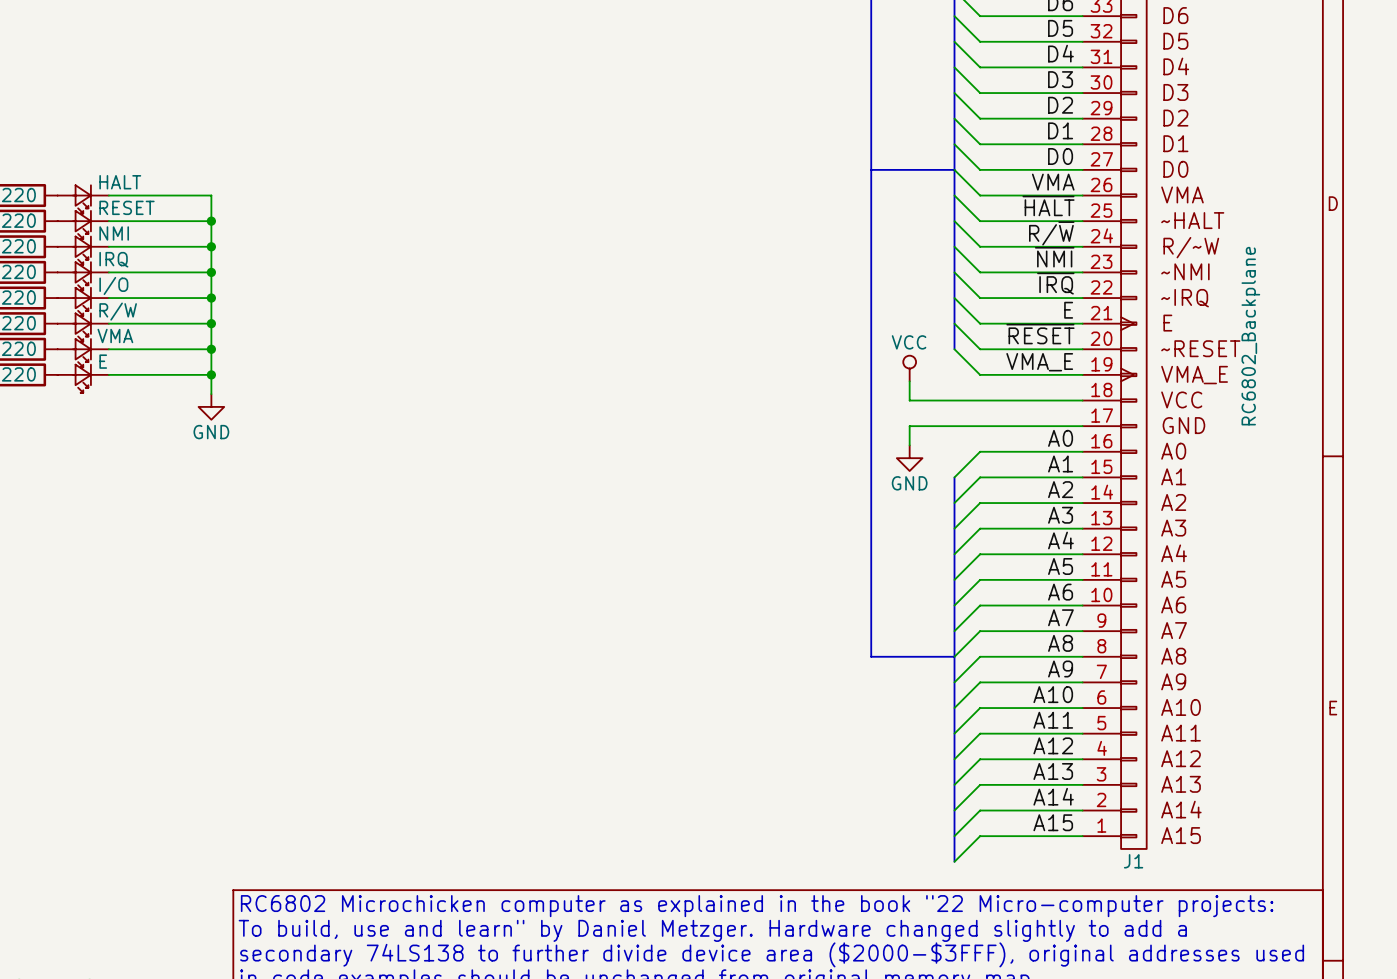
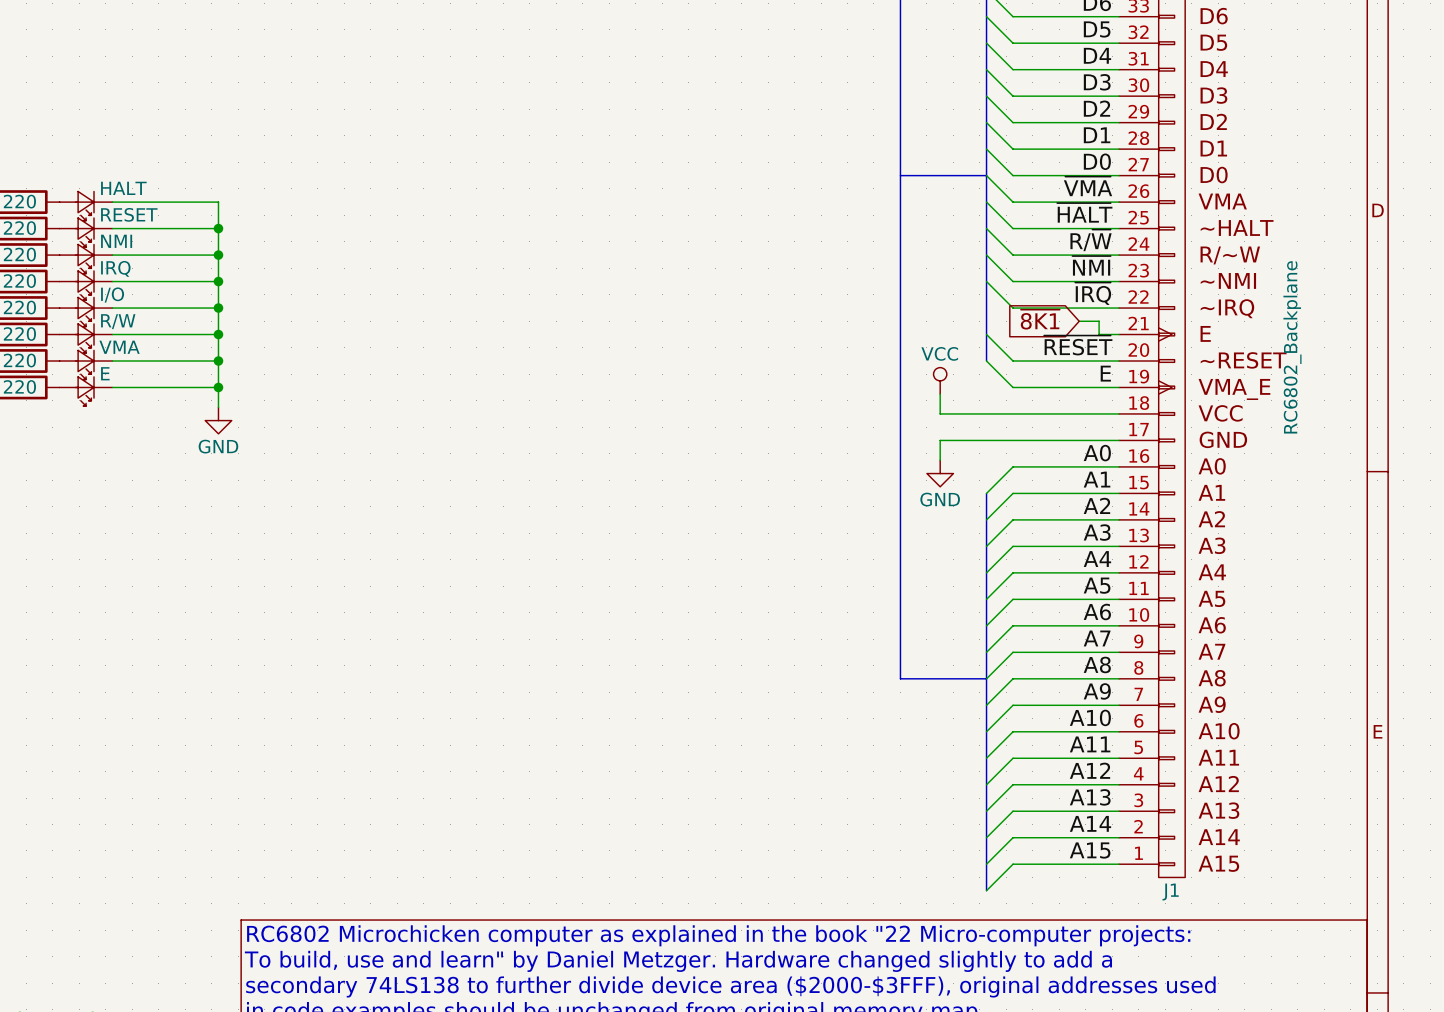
label: VMA (1053, 182) -> ~{VMA} (1088, 186)
wire: (954, 298) (980, 323) (1063, 323) -> (1079, 321) (1099, 321) (1099, 334)
global label: none -> ~{8K1} (1040, 319)
label: E (1068, 310) -> none
label: VMA_E (1039, 362) -> E (1105, 373)

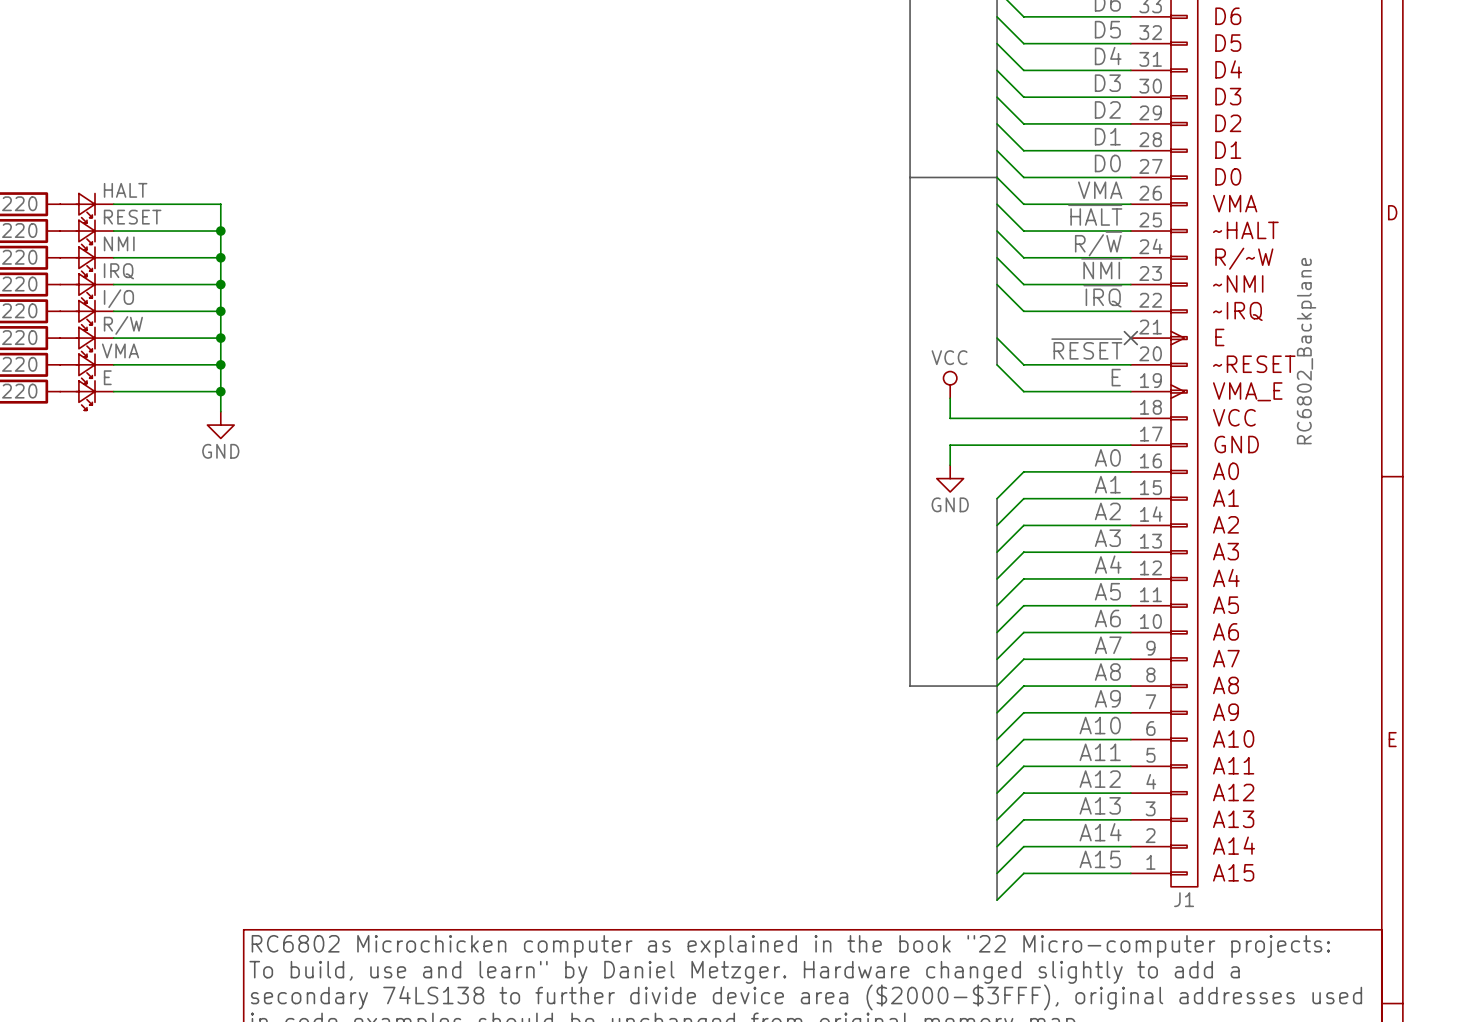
label: ~{VMA} (1088, 186) -> VMA (1100, 190)
global label: ~{8K1} (1040, 319) -> none
wire: (1079, 321) (1099, 321) (1099, 334) (1118, 334) -> none
no-connect mark: none -> (1130, 338)

